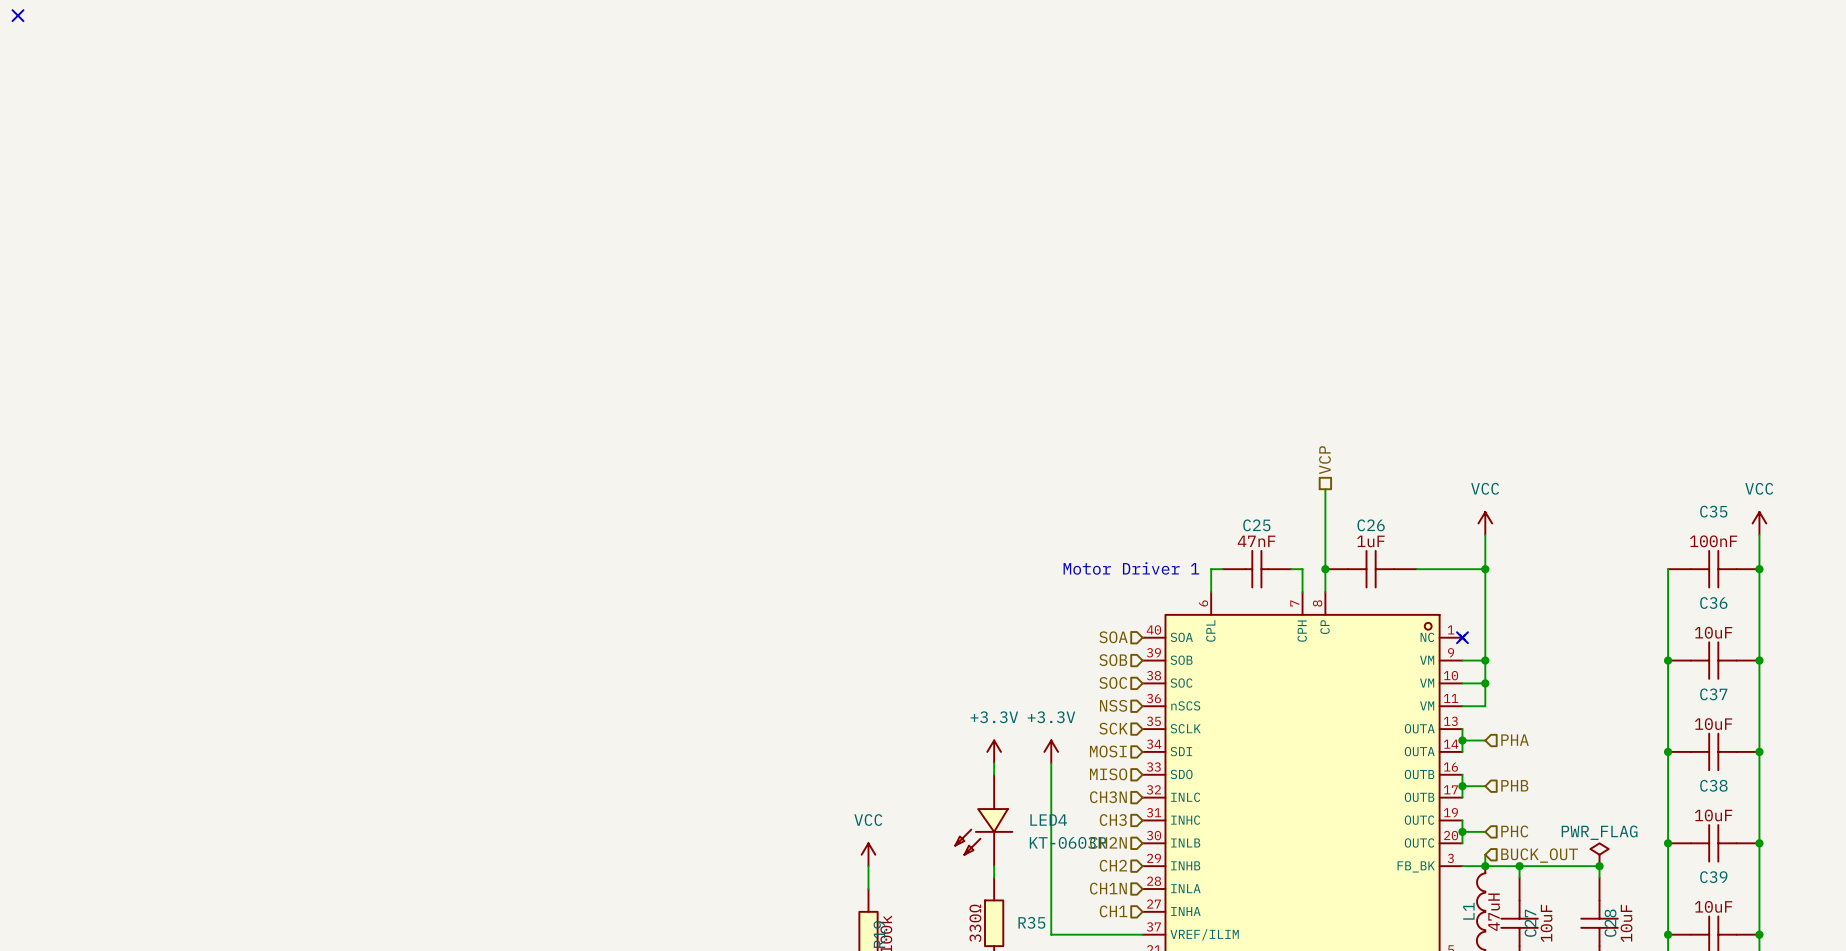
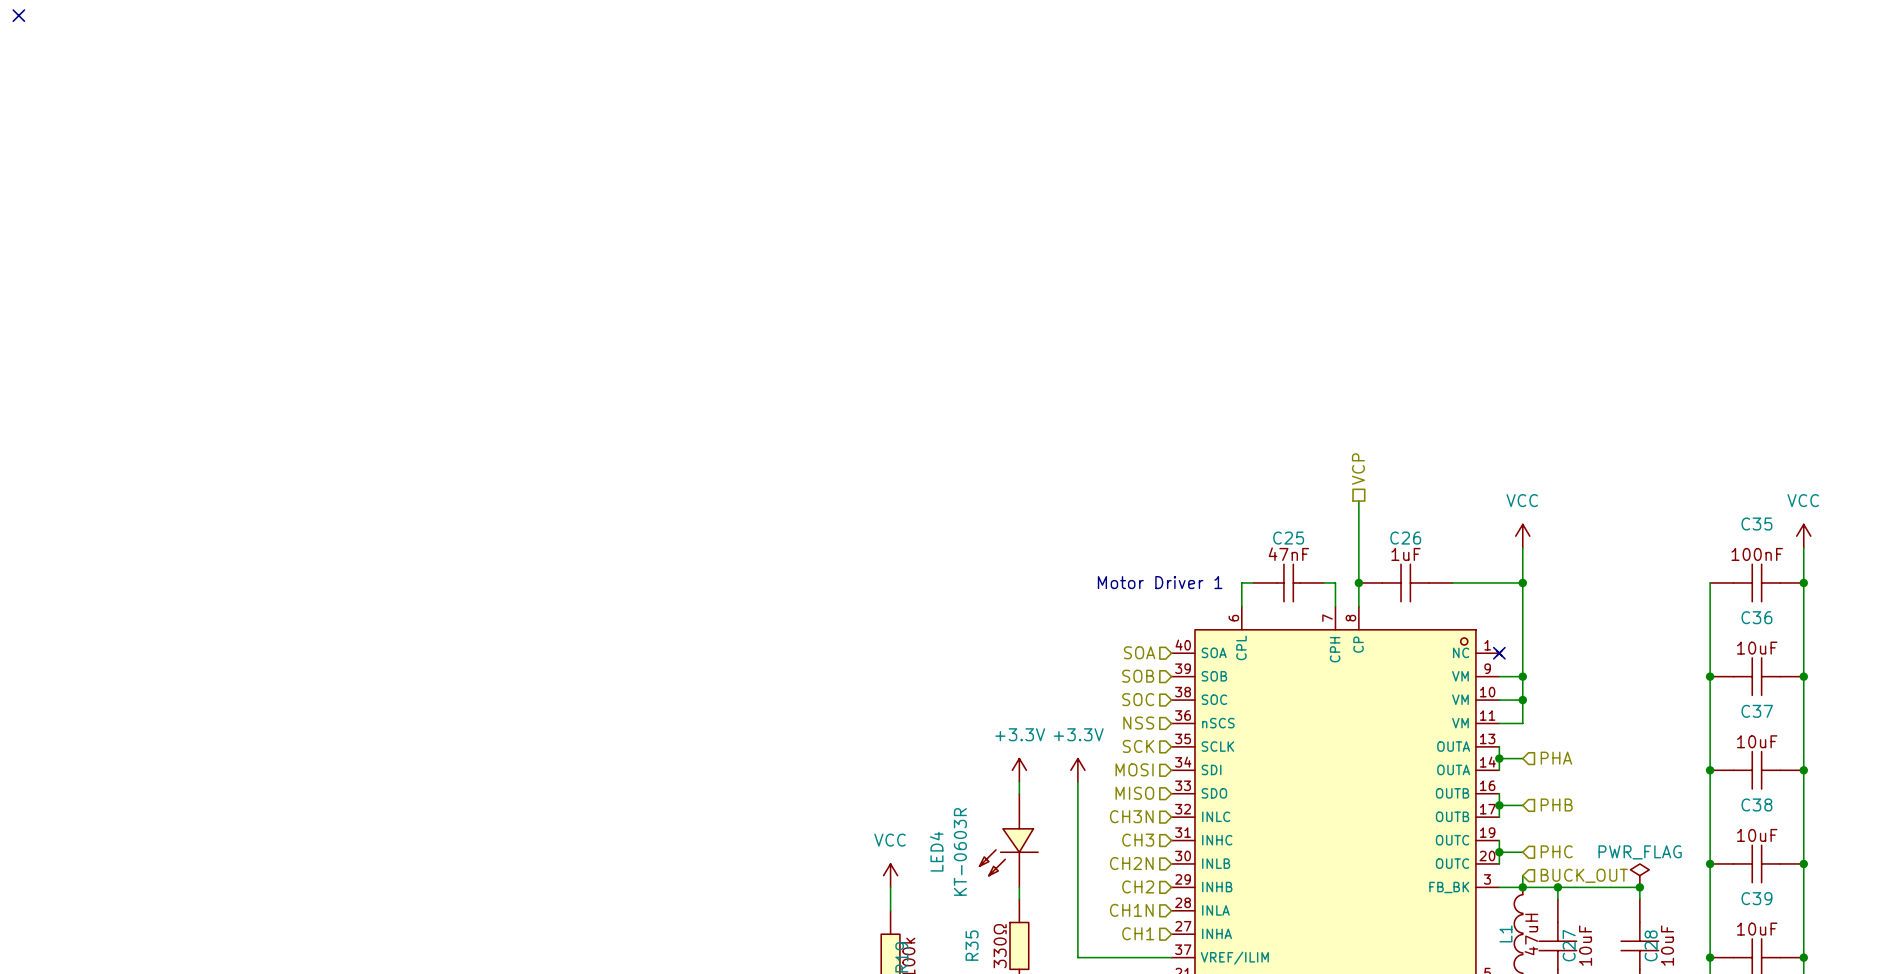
LED4 name rotation: 0° (1048, 820) -> 90° counterclockwise (936, 851)
LED4 name position: LED4 (1048, 820) -> LED4 (936, 851)
LED4 value rotation: 0° (1067, 842) -> 90° counterclockwise (960, 851)
LED4 value position: KT-0603R (1067, 842) -> KT-0603R (960, 851)
R35 name rotation: 0° (1031, 922) -> 90° counterclockwise (972, 945)
R35 name position: R35 (1031, 922) -> R35 (972, 945)

